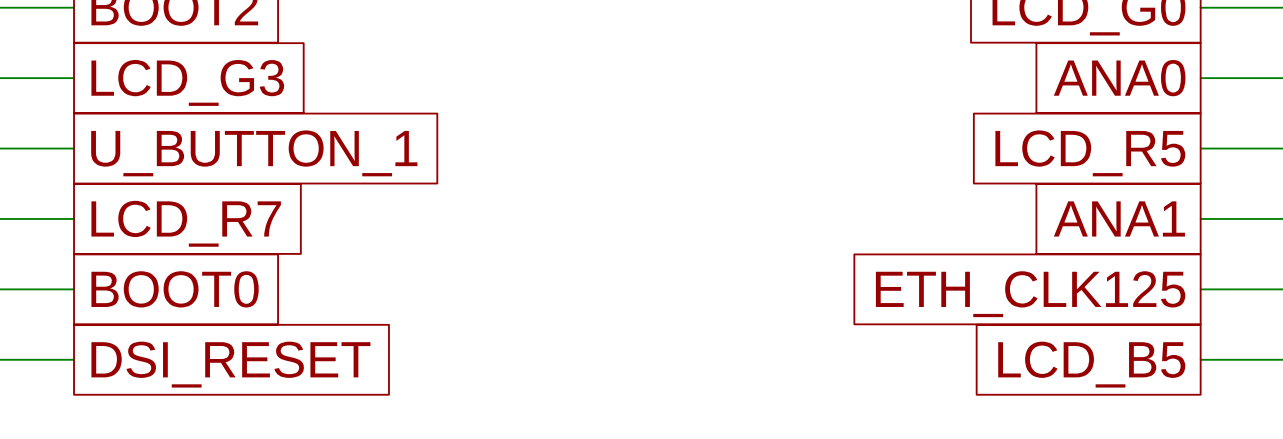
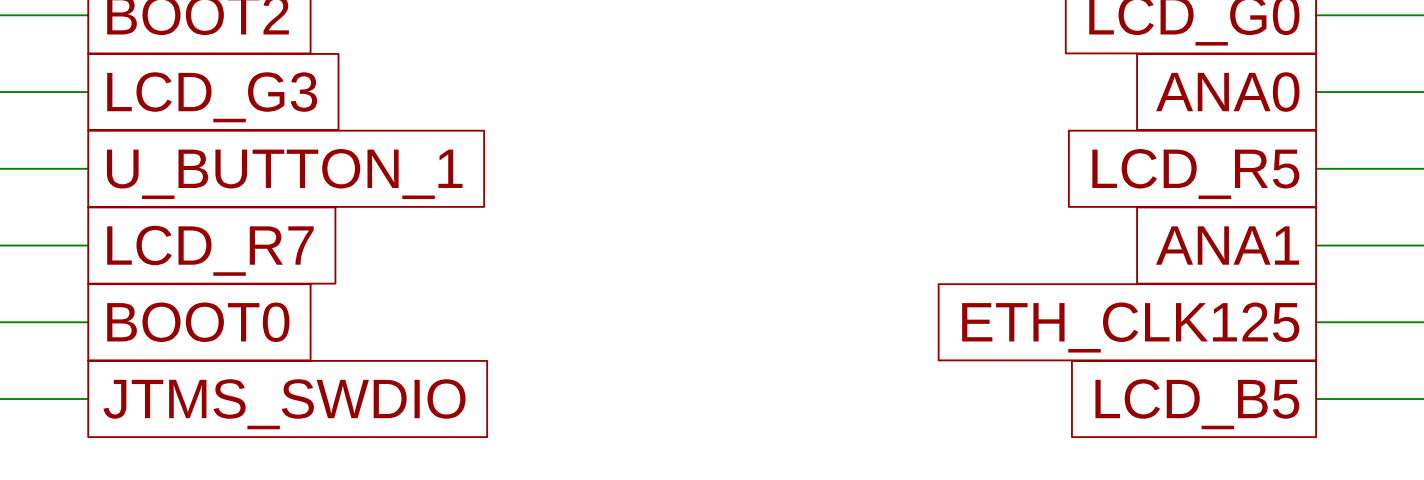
global label: DSI_RESET (230, 364) -> JTMS_SWDIO (284, 404)

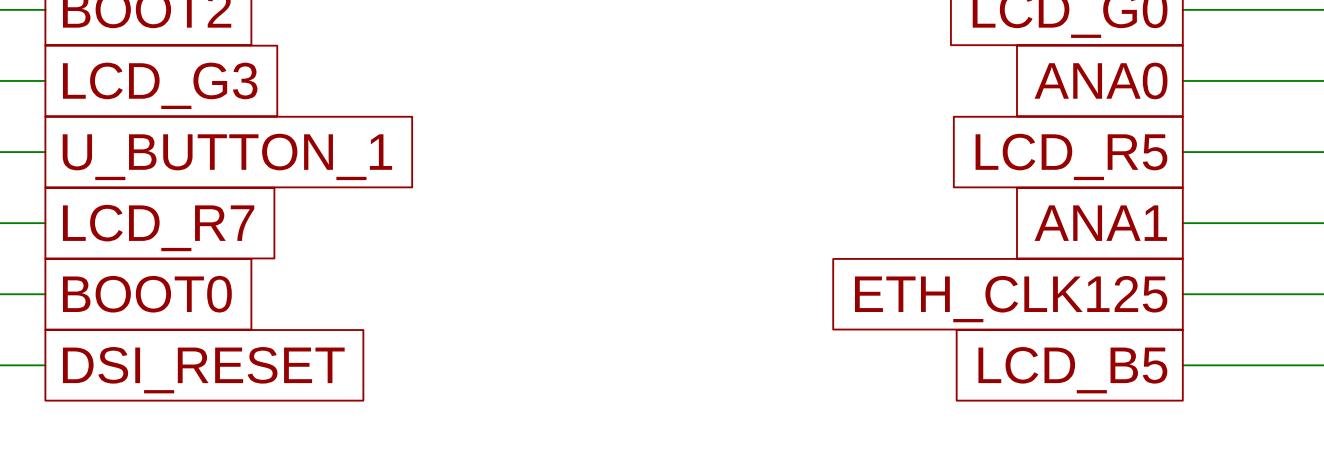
global label: JTMS_SWDIO (284, 404) -> DSI_RESET (203, 370)

